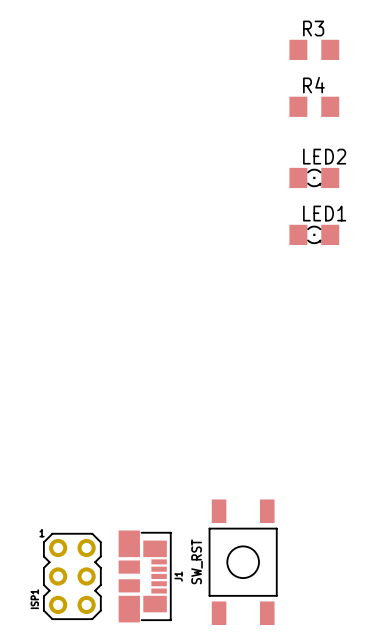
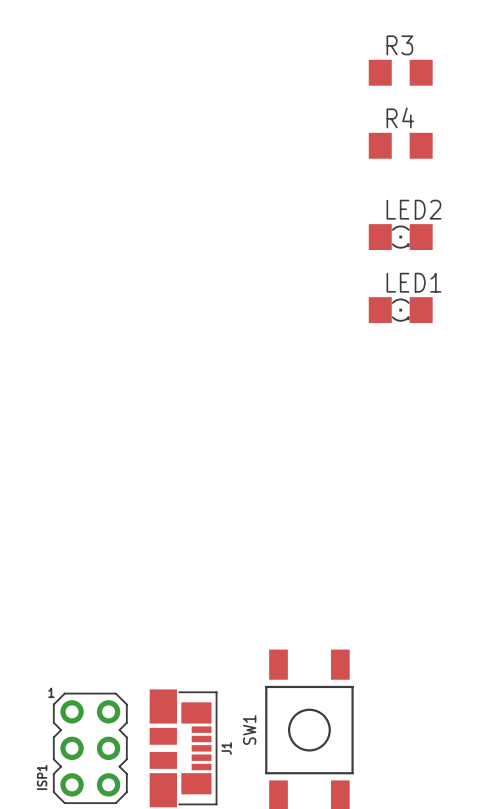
SW_RST name: SW_RST (197, 561) -> SW1 (249, 730)

